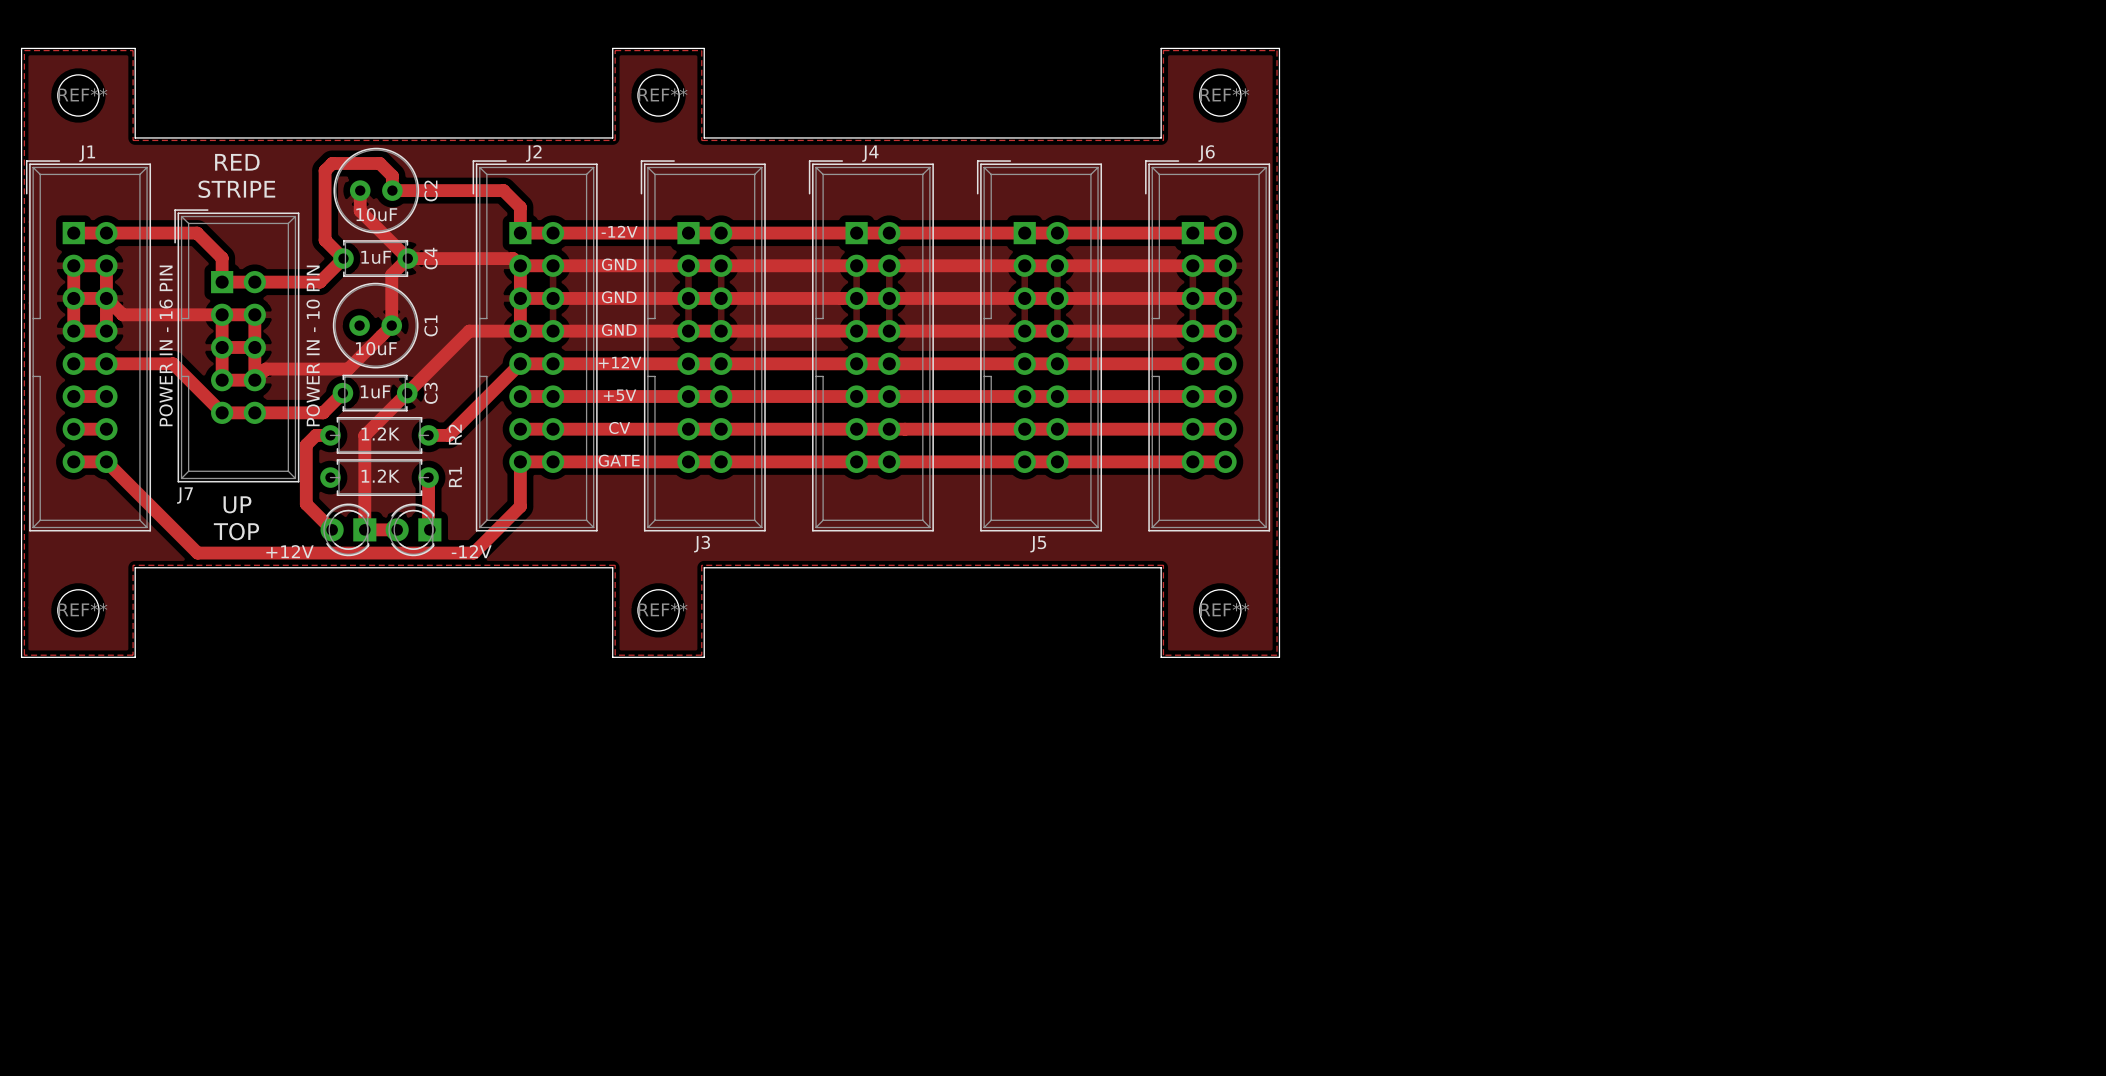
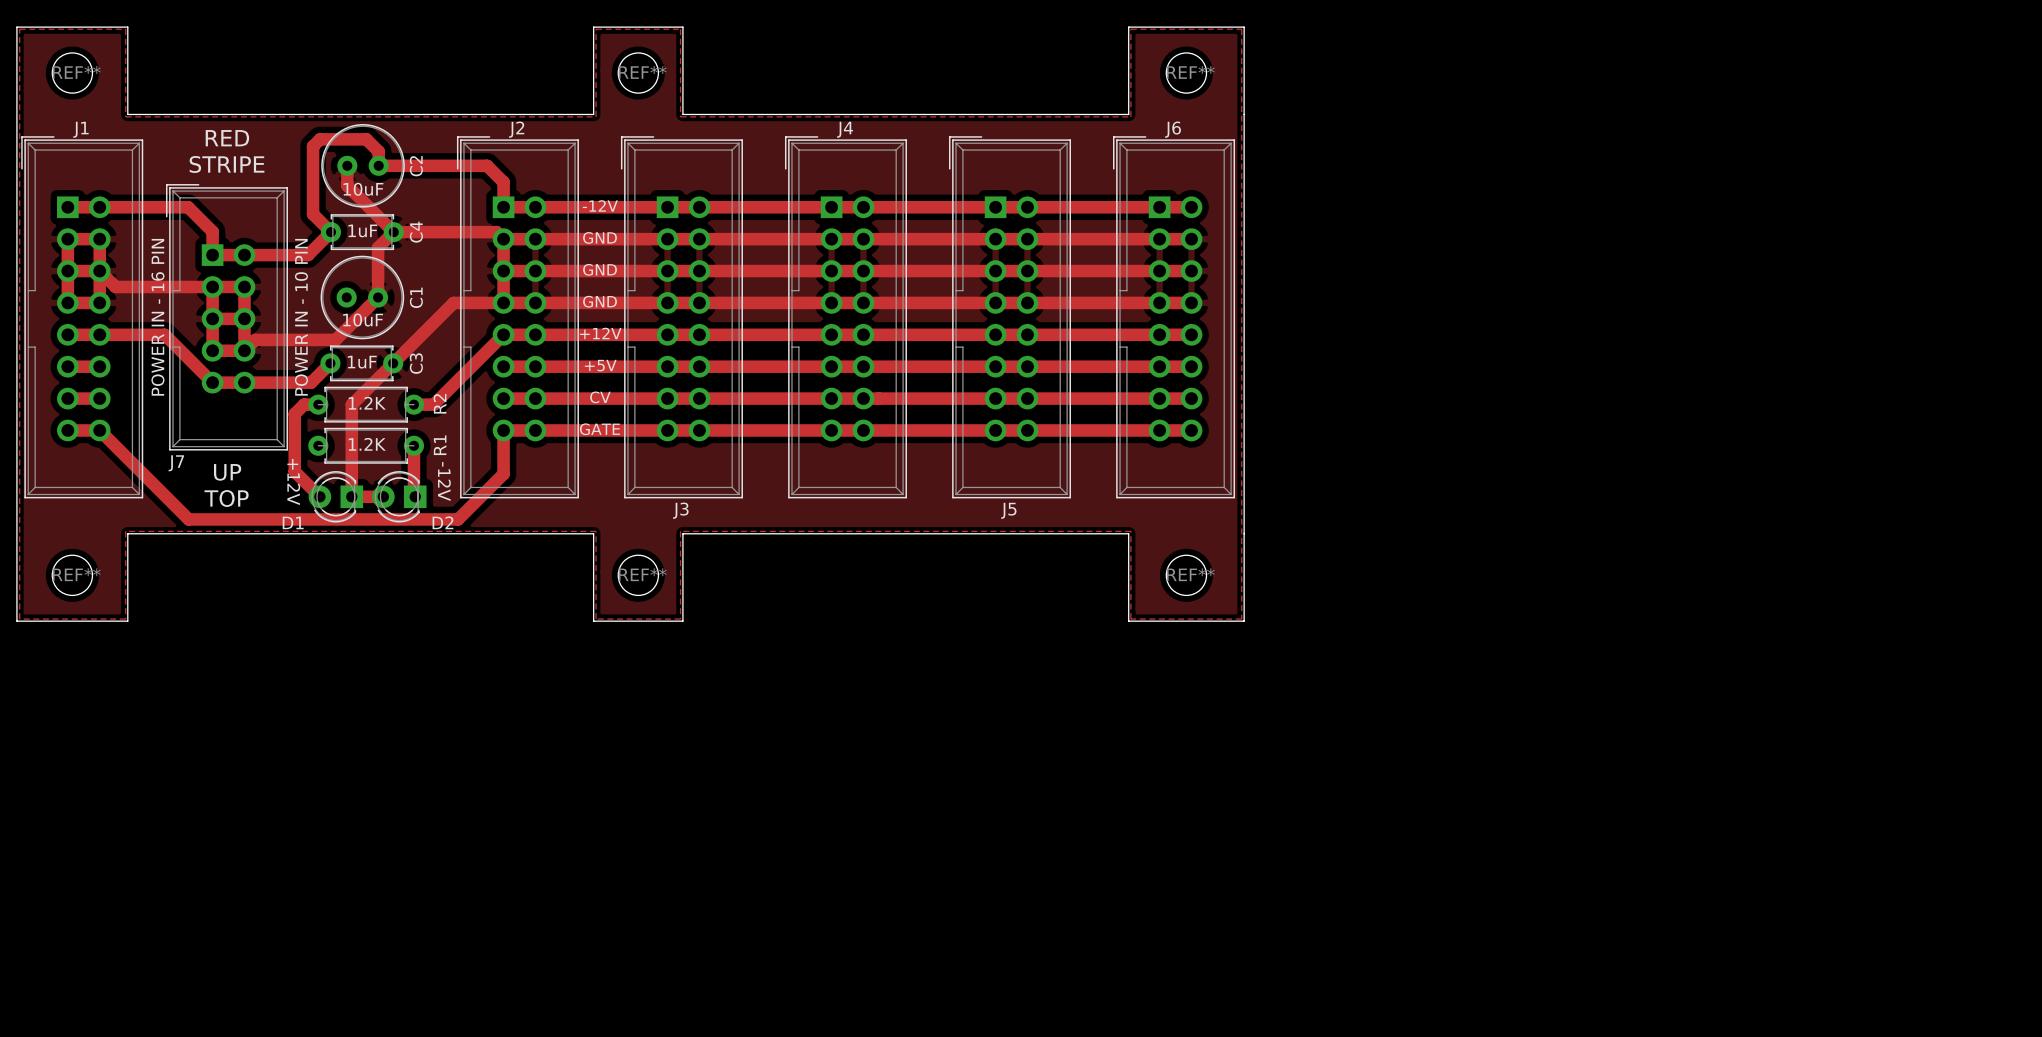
text: none -> +12V (293, 482)
text: none -> -12V (444, 481)
+12V name: +12V (290, 551) -> D1 (293, 522)
-12V name: -12V (471, 551) -> D2 (442, 522)

